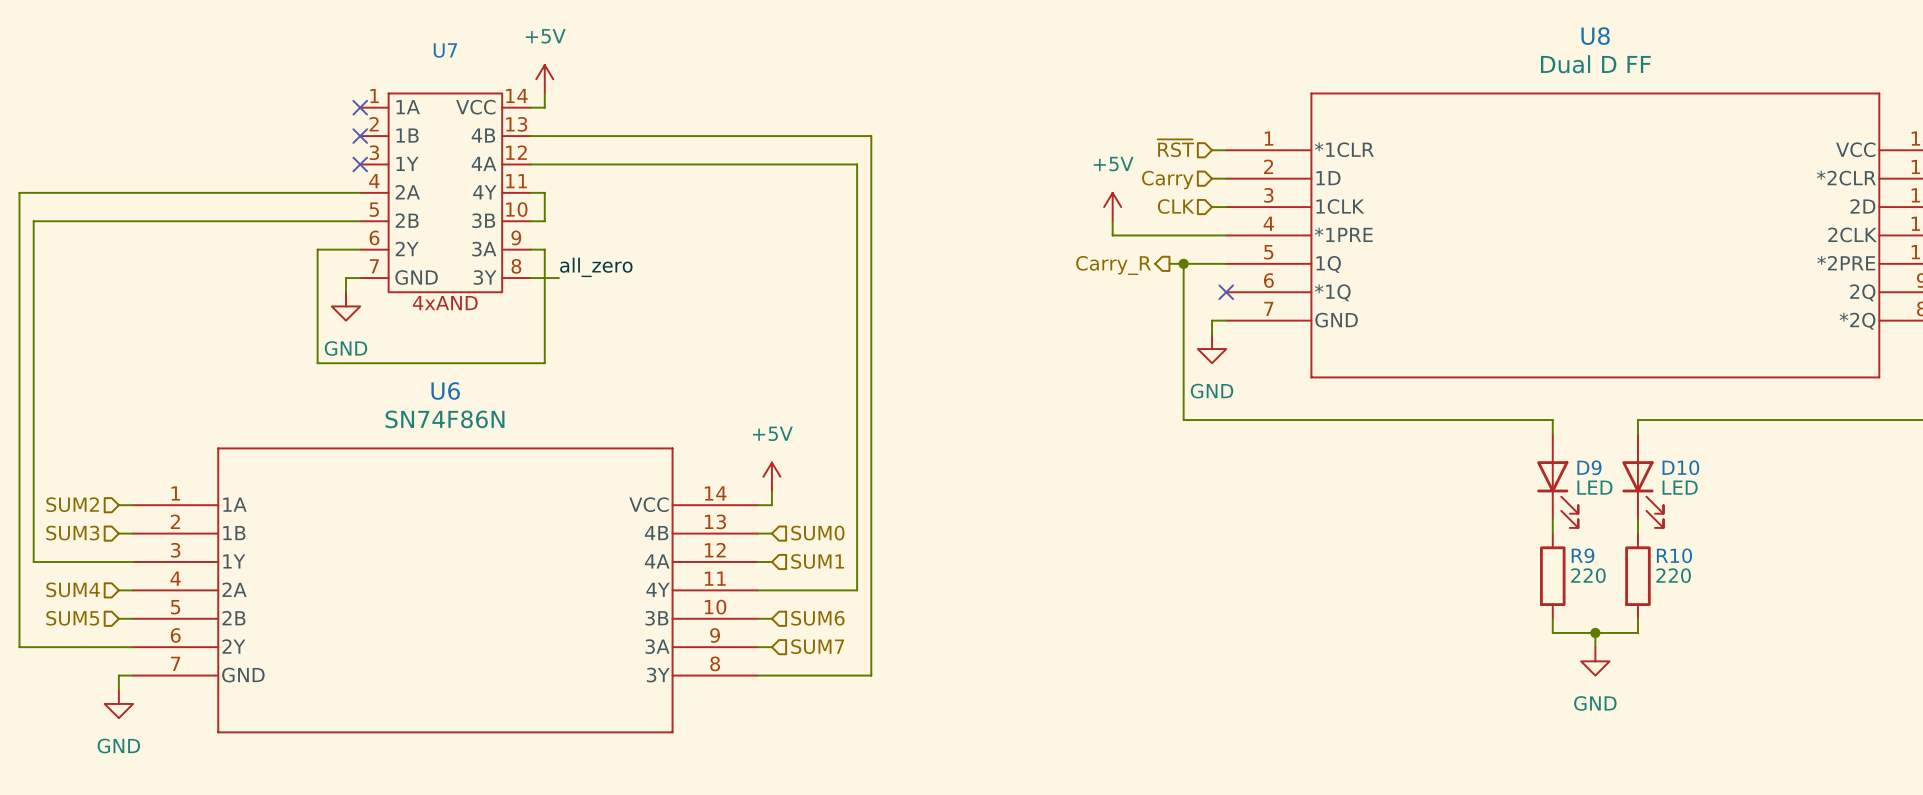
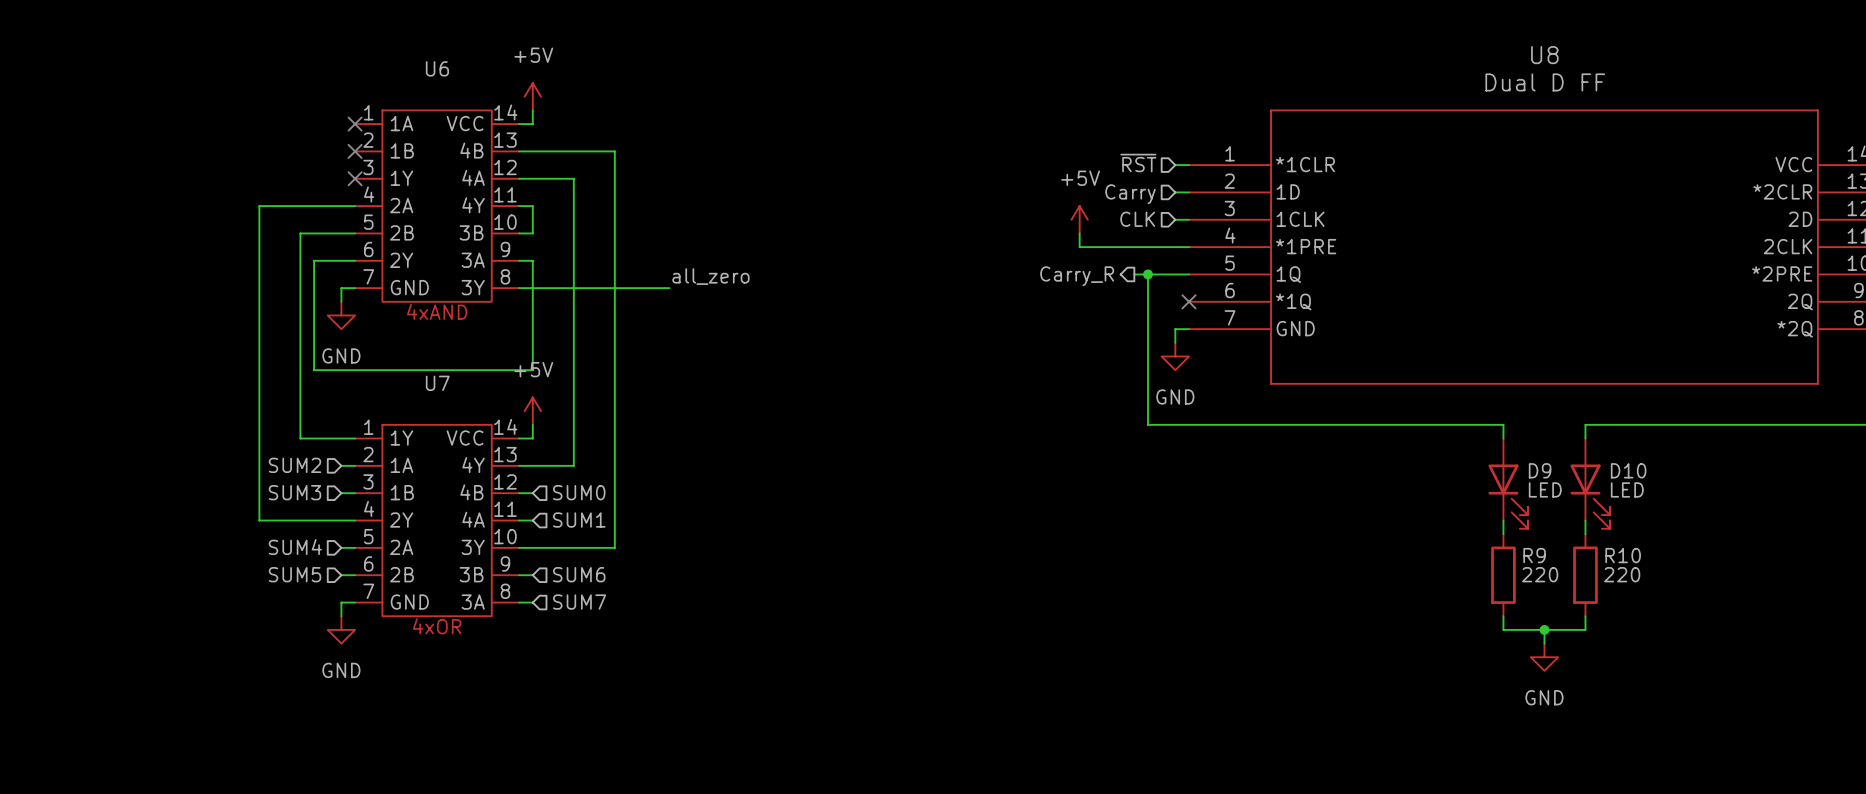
U7 name: U7 (445, 50) -> U6 (437, 68)
wire: (629, 136) (871, 136) (871, 675) (757, 675) -> (614, 151) (614, 547) (519, 547)
wire: (587, 164) (857, 164) (857, 590) (757, 590) -> (573, 178) (573, 465) (519, 465)
wire: (260, 192) (19, 192) (19, 647) (133, 647) -> (259, 206) (259, 520) (355, 520)
wire: (303, 221) (33, 221) (33, 561) (133, 561) -> (300, 233) (300, 438) (355, 438)
label position: all_zero (596, 267) -> all_zero (710, 276)
wire: none -> (546, 288) (669, 288)
power symbol position: +5V (771, 476) -> +5V (532, 411)
wire: (771, 491) (771, 505) (757, 505) -> (532, 424) (532, 438) (519, 438)
hierarchical label position: SUM2 (72, 504) -> SUM2 (294, 465)
wire: (118, 505) (133, 505) -> (341, 465) (355, 465)
U7: none -> (437, 520)
hierarchical label position: SUM3 (72, 533) -> SUM3 (294, 492)
wire: (118, 533) (133, 533) -> (341, 493) (355, 493)
wire: (757, 533) (771, 533) -> (519, 493) (532, 493)
hierarchical label position: SUM0 (817, 533) -> SUM0 (579, 492)
wire: (757, 561) (771, 561) -> (519, 520) (532, 520)
hierarchical label position: SUM1 (817, 561) -> SUM1 (579, 520)
hierarchical label position: SUM4 (73, 589) -> SUM4 (295, 547)
wire: (118, 590) (133, 590) -> (341, 547) (355, 547)
U6: SN74F86N (445, 590) -> none
hierarchical label position: SUM5 (72, 618) -> SUM5 (294, 574)
wire: (118, 618) (133, 618) -> (341, 575) (355, 575)
wire: (757, 618) (771, 618) -> (519, 575) (532, 575)
hierarchical label position: SUM6 (817, 618) -> SUM6 (579, 574)
hierarchical label position: SUM7 (817, 646) -> SUM7 (579, 602)
wire: (757, 647) (771, 647) -> (519, 602) (532, 602)
wire: (133, 675) (118, 675) (118, 689) -> (355, 602) (341, 602) (341, 616)
power symbol position: GND (118, 703) -> GND (341, 629)

